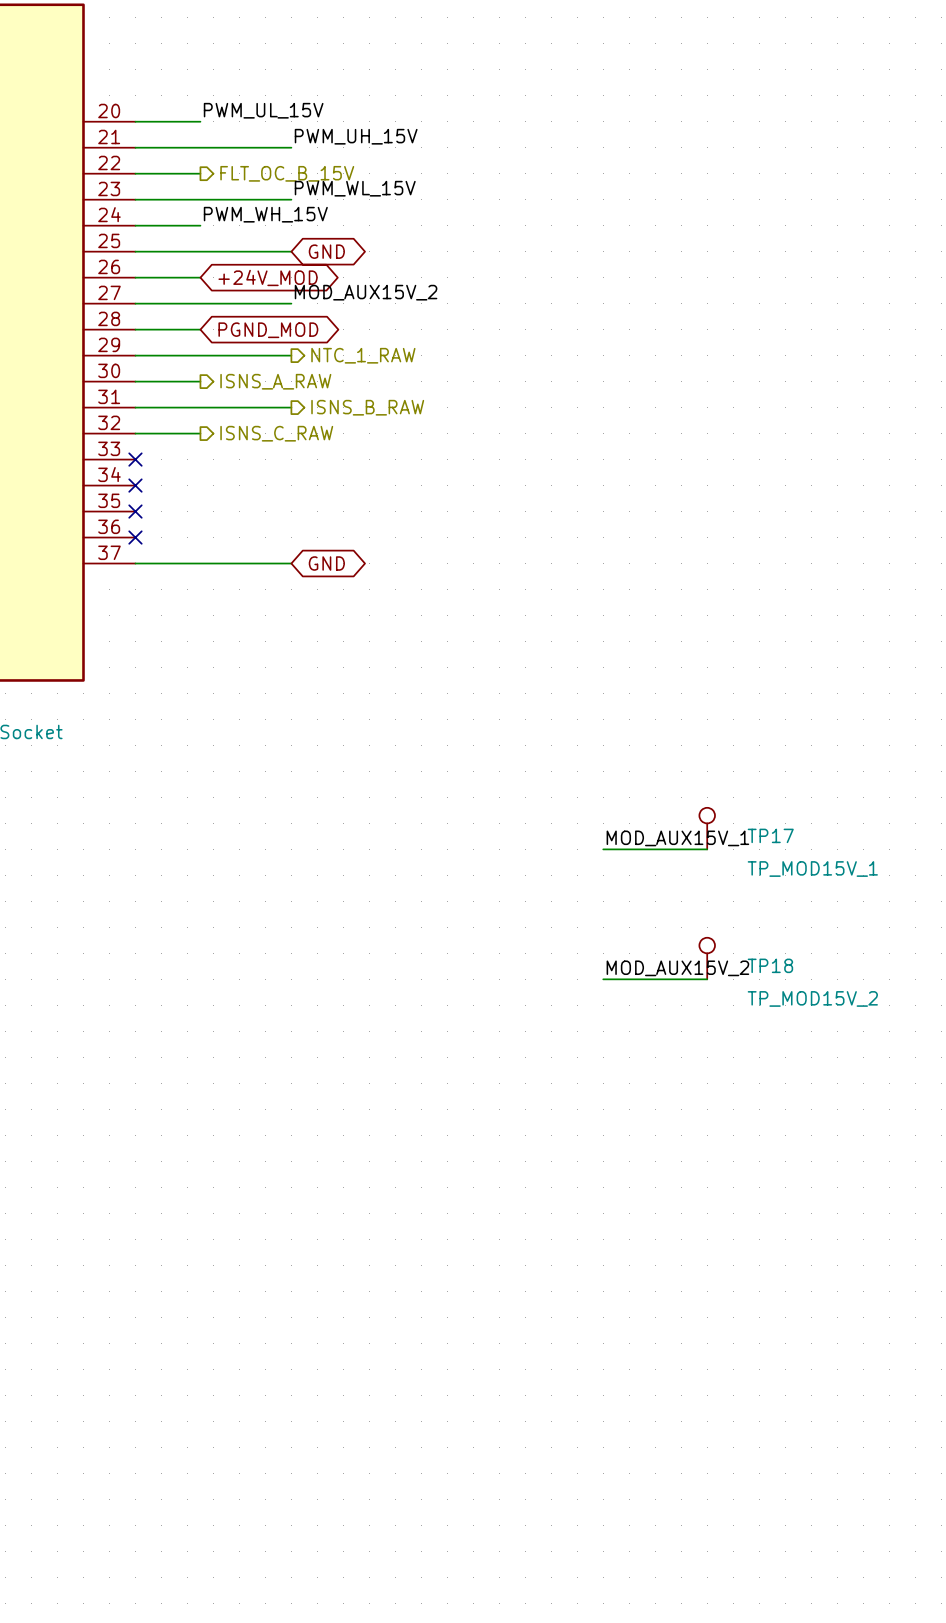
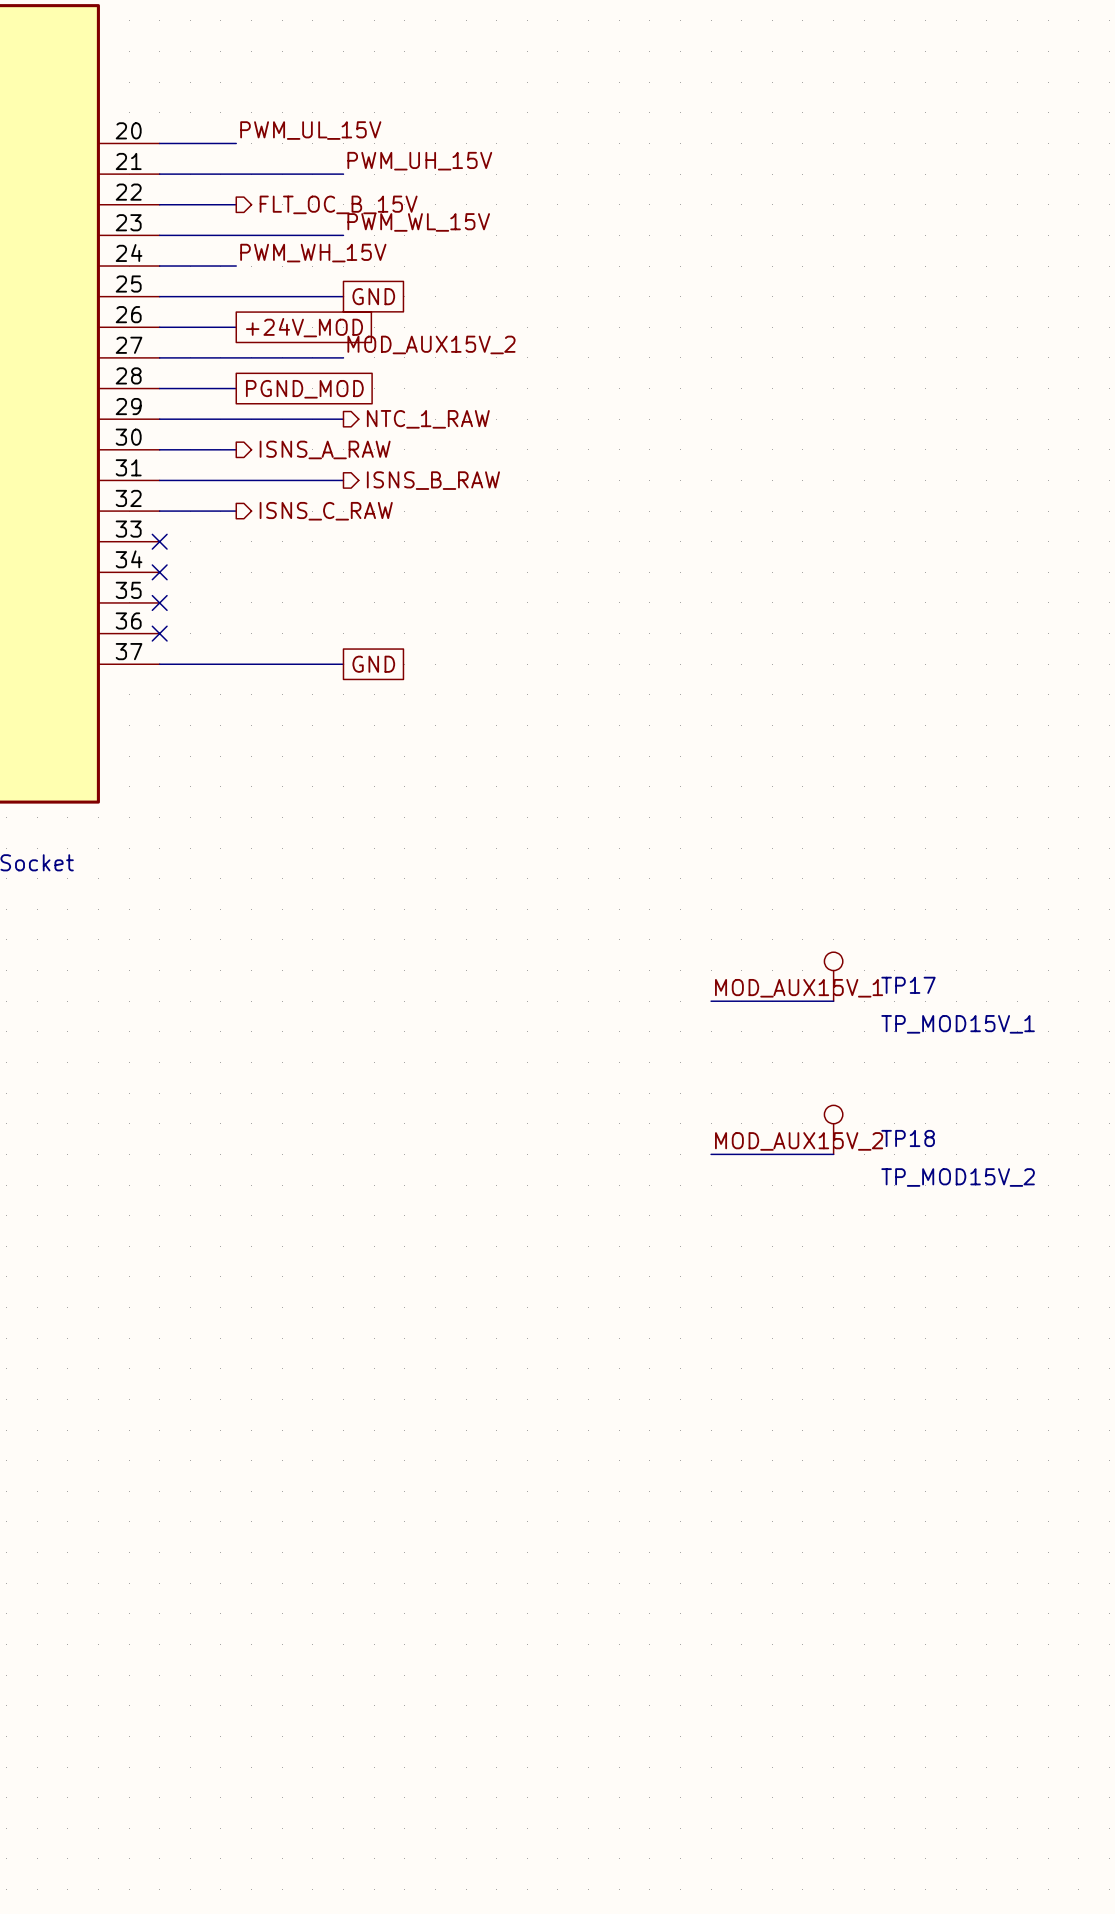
global label shape: bidirectional (326, 251) -> passive (373, 296)
global label shape: bidirectional (268, 277) -> passive (304, 327)
global label shape: bidirectional (268, 330) -> passive (304, 389)
global label shape: bidirectional (326, 563) -> passive (373, 664)

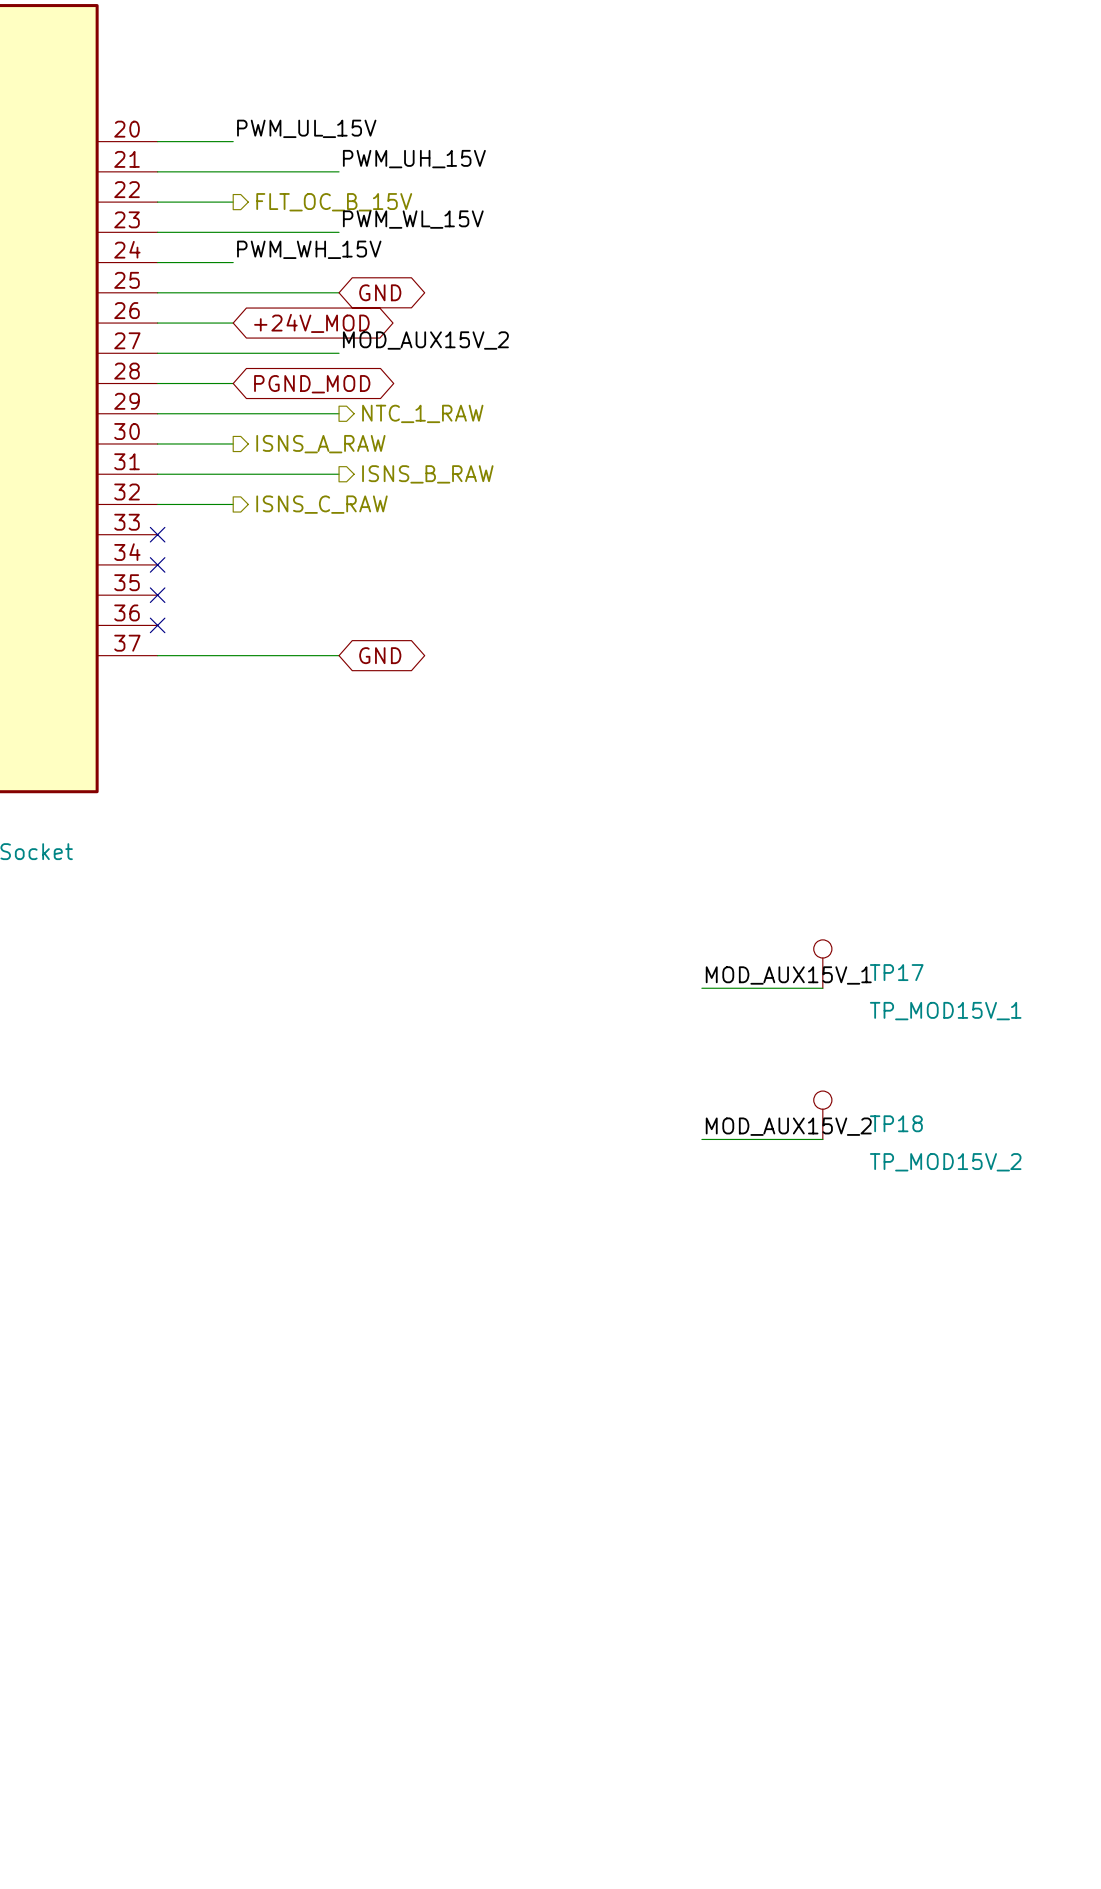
global label shape: passive (373, 296) -> bidirectional (380, 292)
global label shape: passive (304, 327) -> bidirectional (311, 323)
global label shape: passive (304, 389) -> bidirectional (312, 384)
global label shape: passive (373, 664) -> bidirectional (380, 655)

